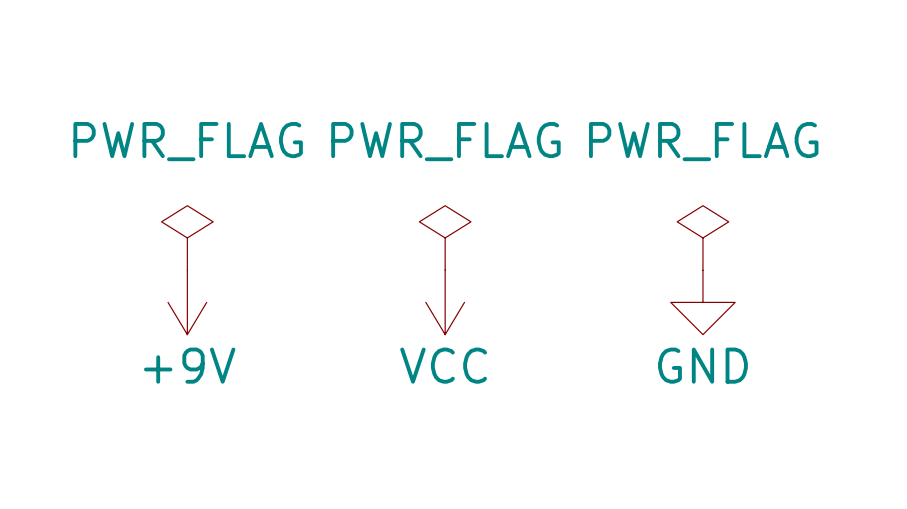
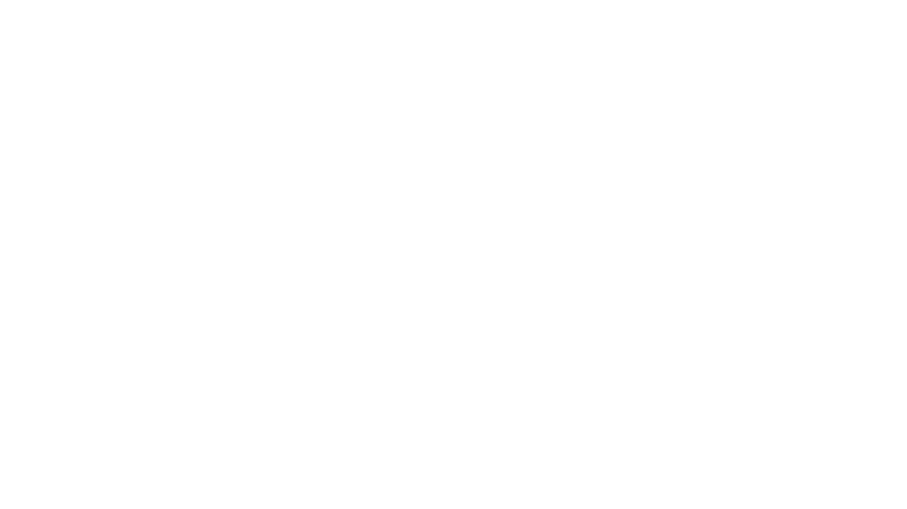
power symbol: PWR_FLAG (187, 237) -> none
power symbol: PWR_FLAG (445, 237) -> none
power symbol: PWR_FLAG (702, 237) -> none
power symbol: +9V (187, 302) -> none
power symbol: VCC (445, 302) -> none
power symbol: GND (702, 302) -> none

